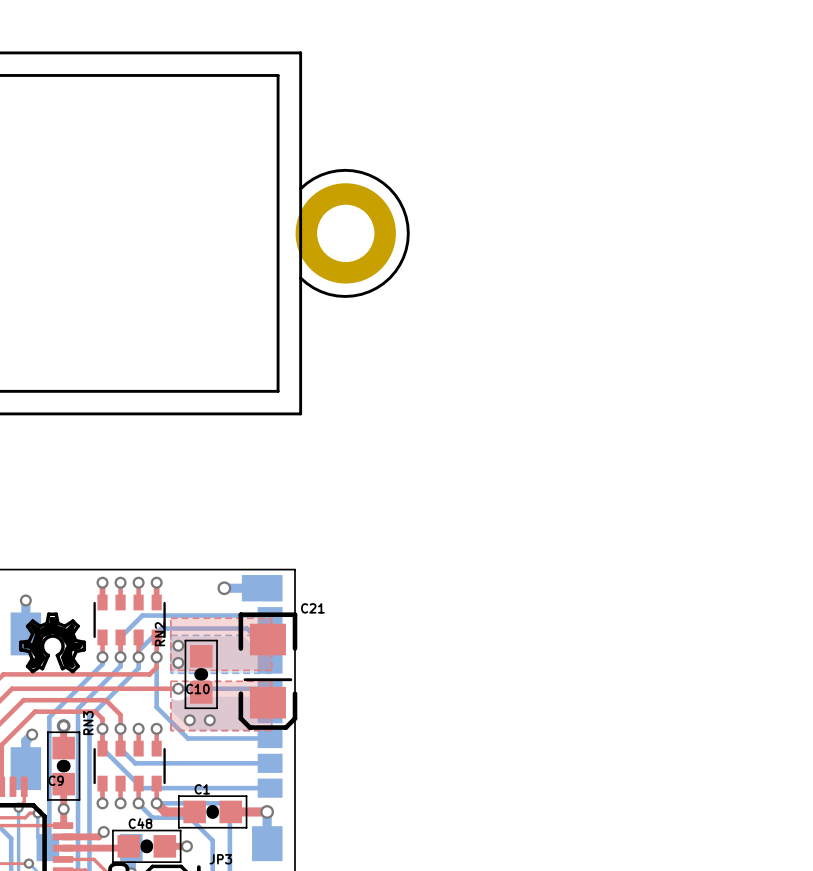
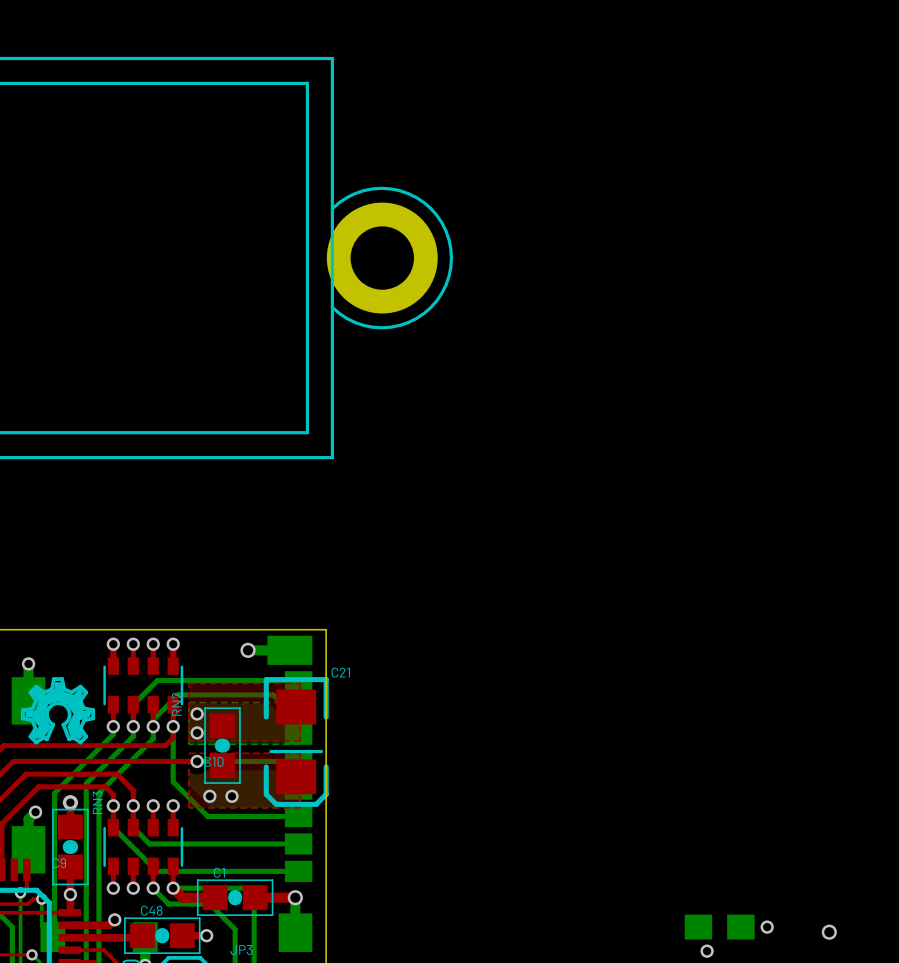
part: none -> (719, 927)
via: none -> (767, 927)
via: none -> (829, 932)
via: none -> (707, 951)

